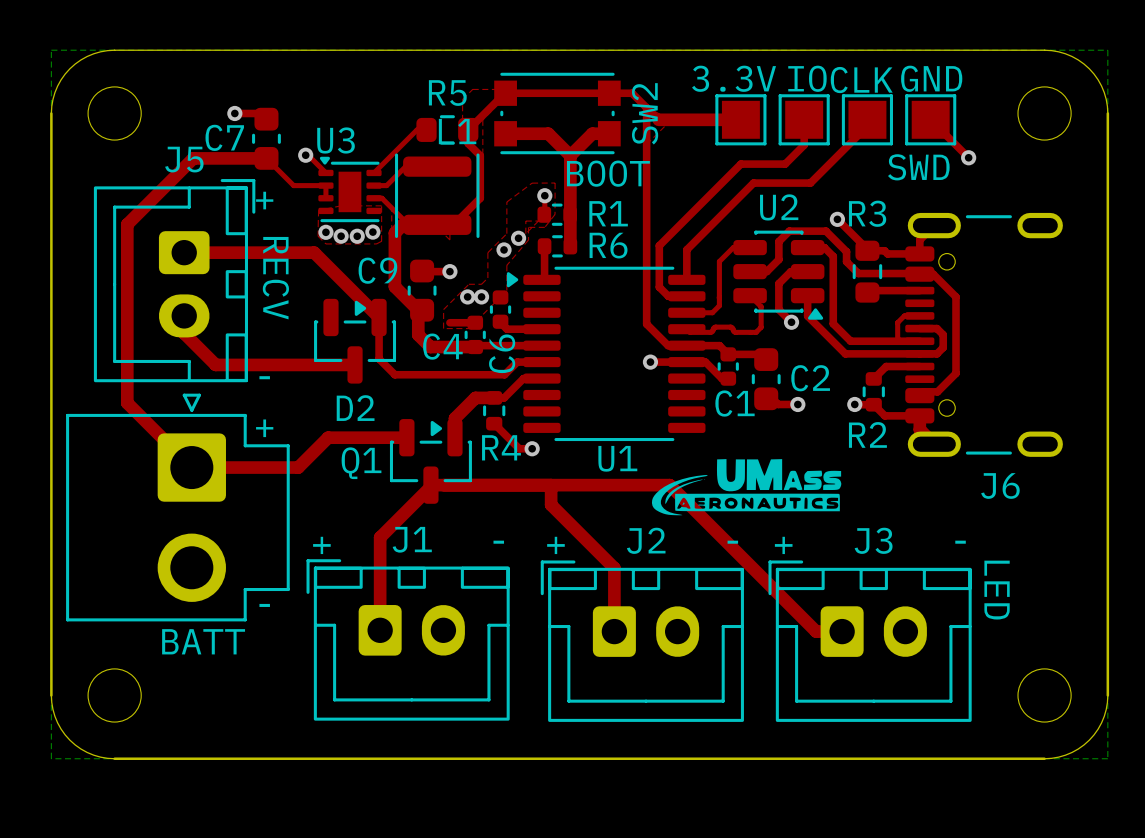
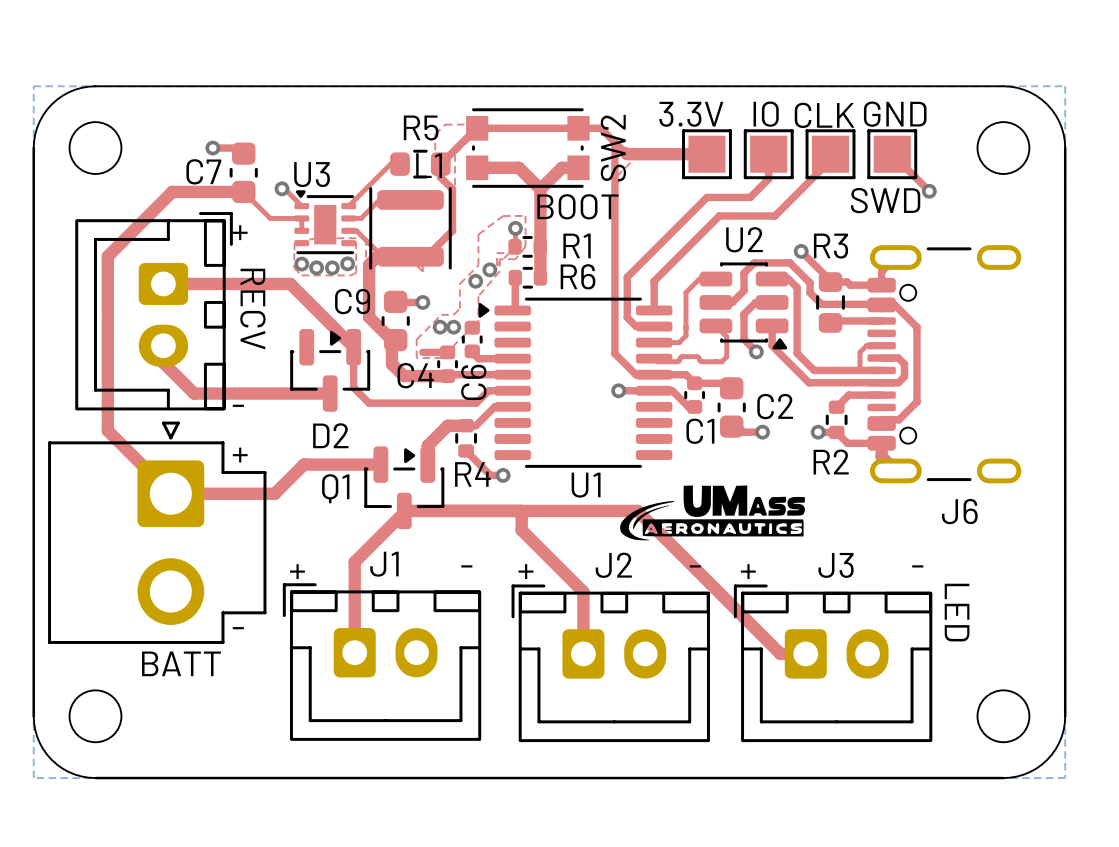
J5 name: J5 (184, 159) -> none

